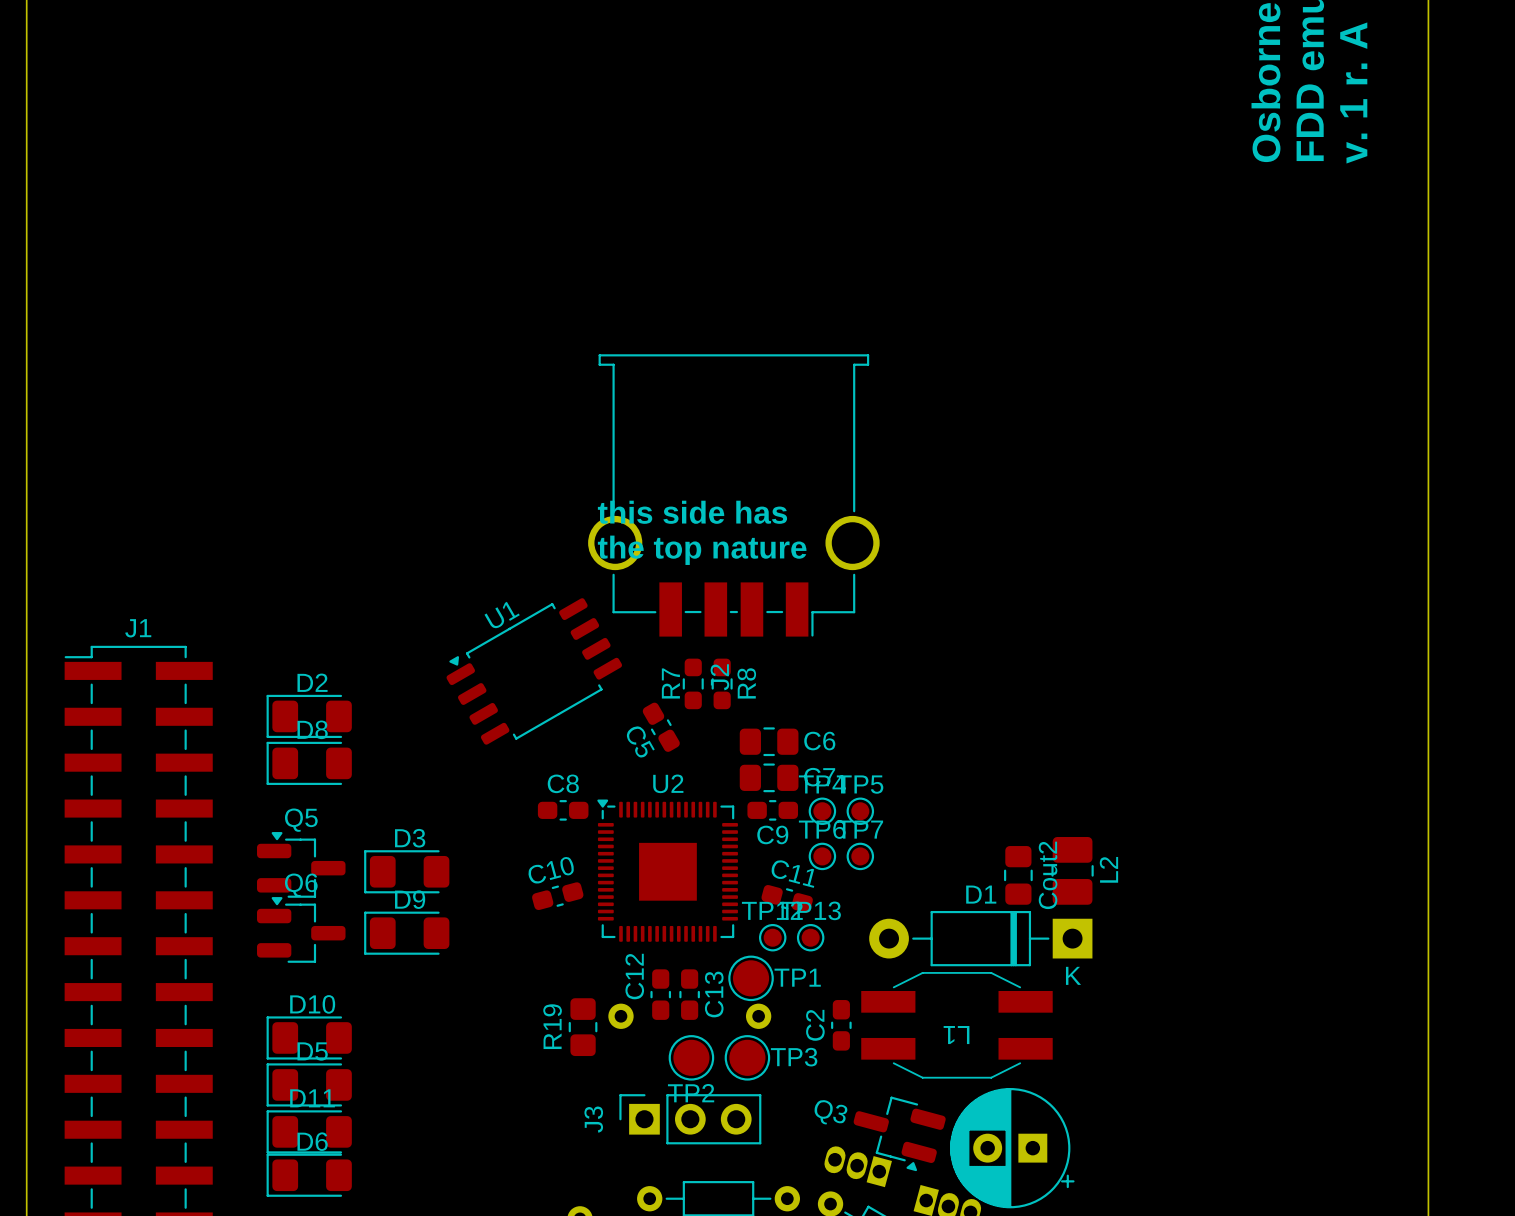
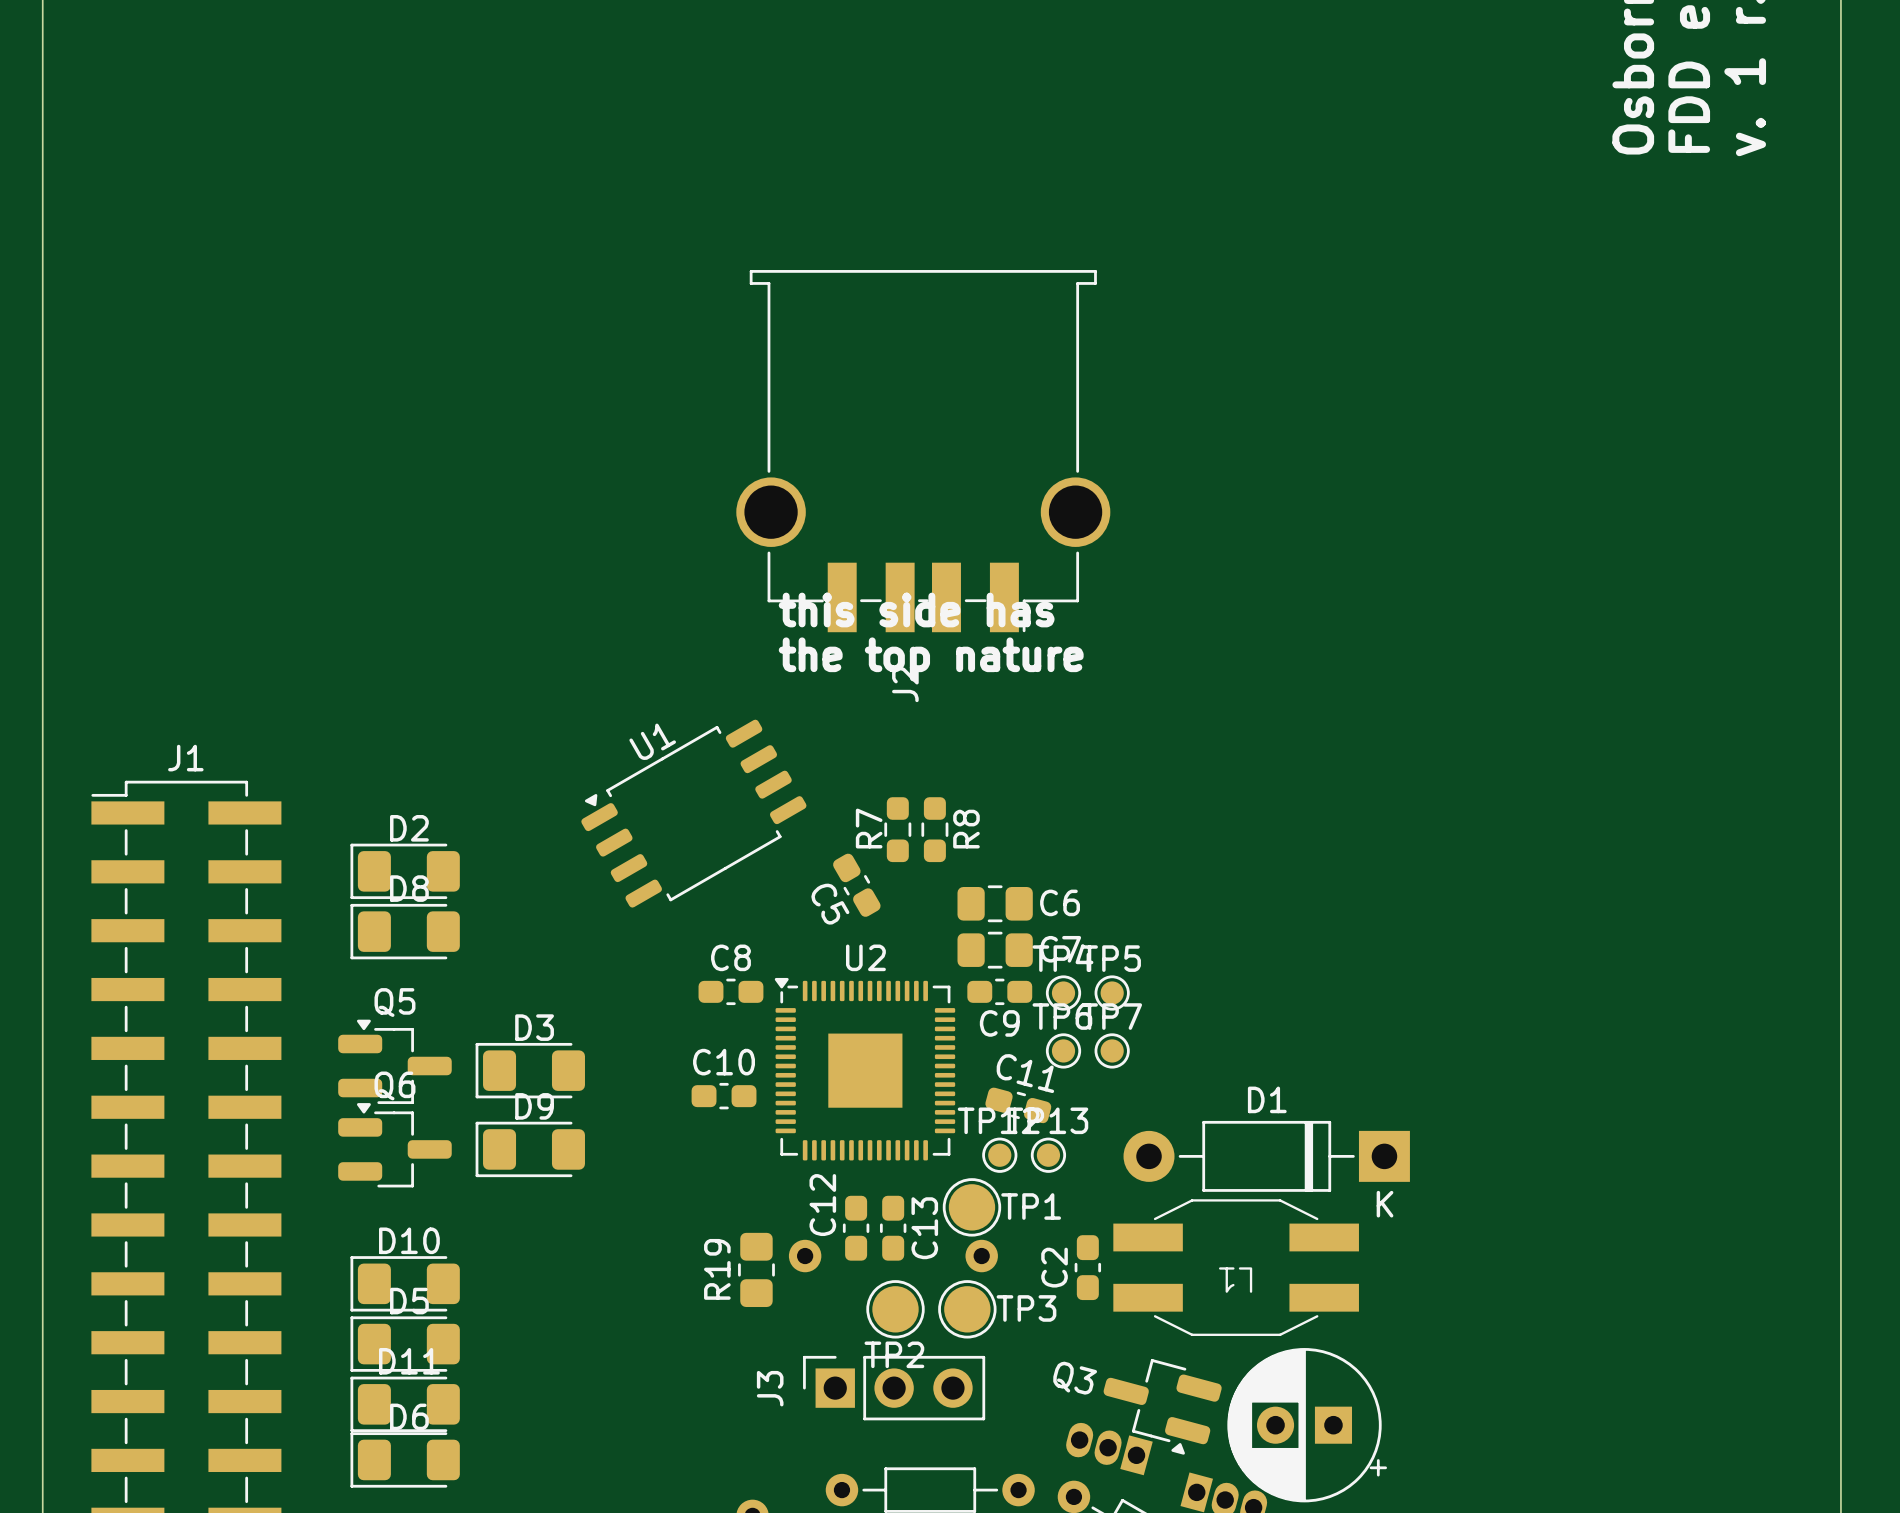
J2 position: (733, 495) -> (923, 451)
L2: (1072, 870) -> none
Cout2: (1018, 875) -> none
C10 rotation: 0° (557, 896) -> 15° clockwise (724, 1096)

